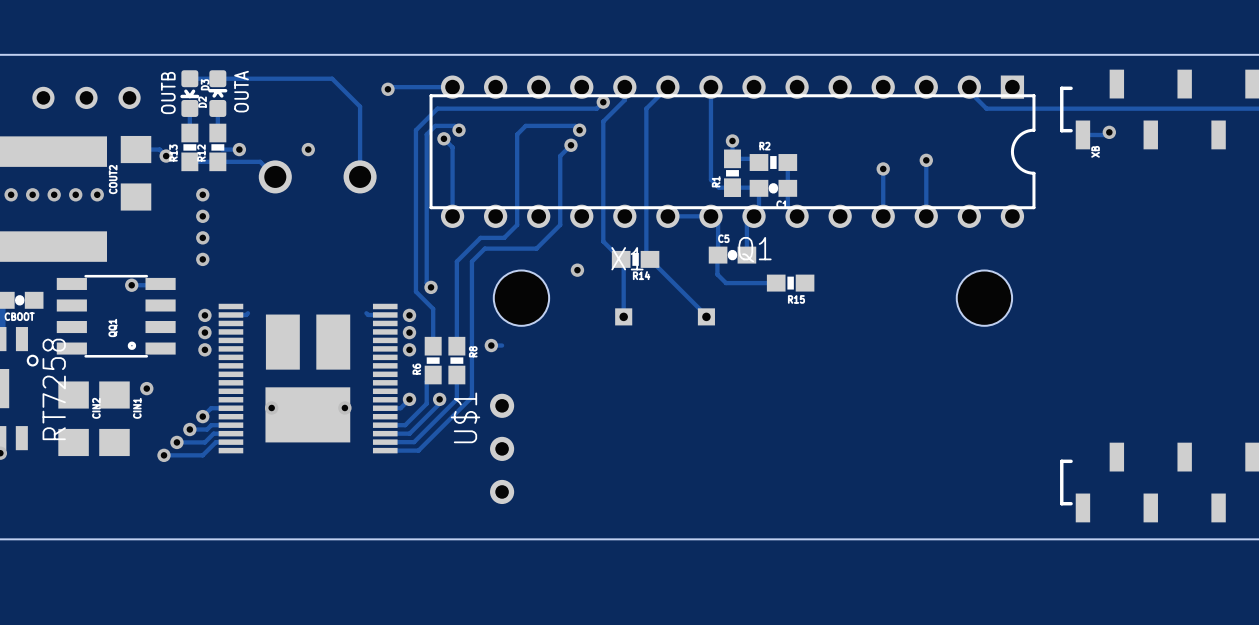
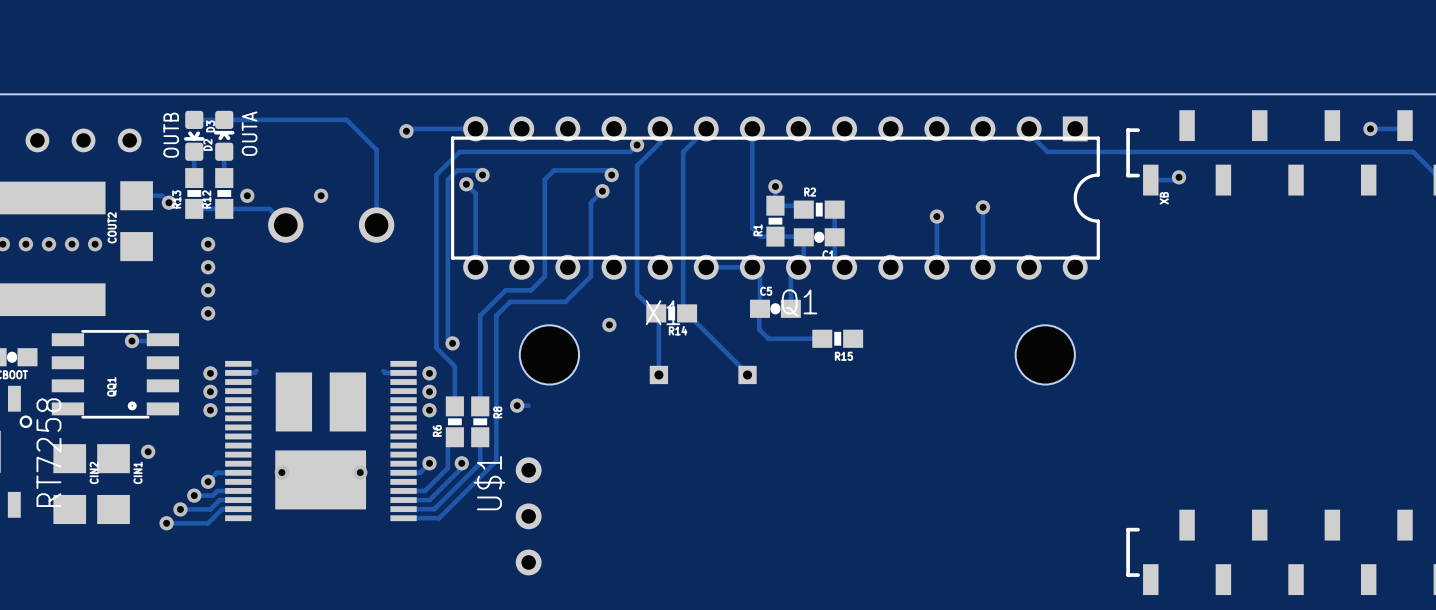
track: (222, 149) (239, 149) -> none

